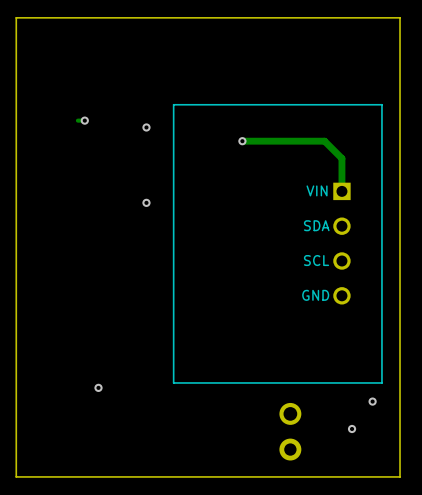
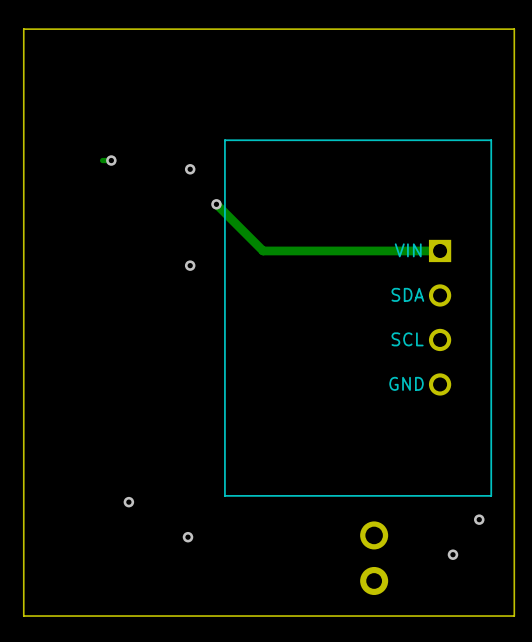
track: (242, 141) (324, 141) (341, 158) (341, 191) -> (216, 204) (263, 250) (440, 250)
via position: (242, 141) -> (216, 204)
via: none -> (188, 537)

